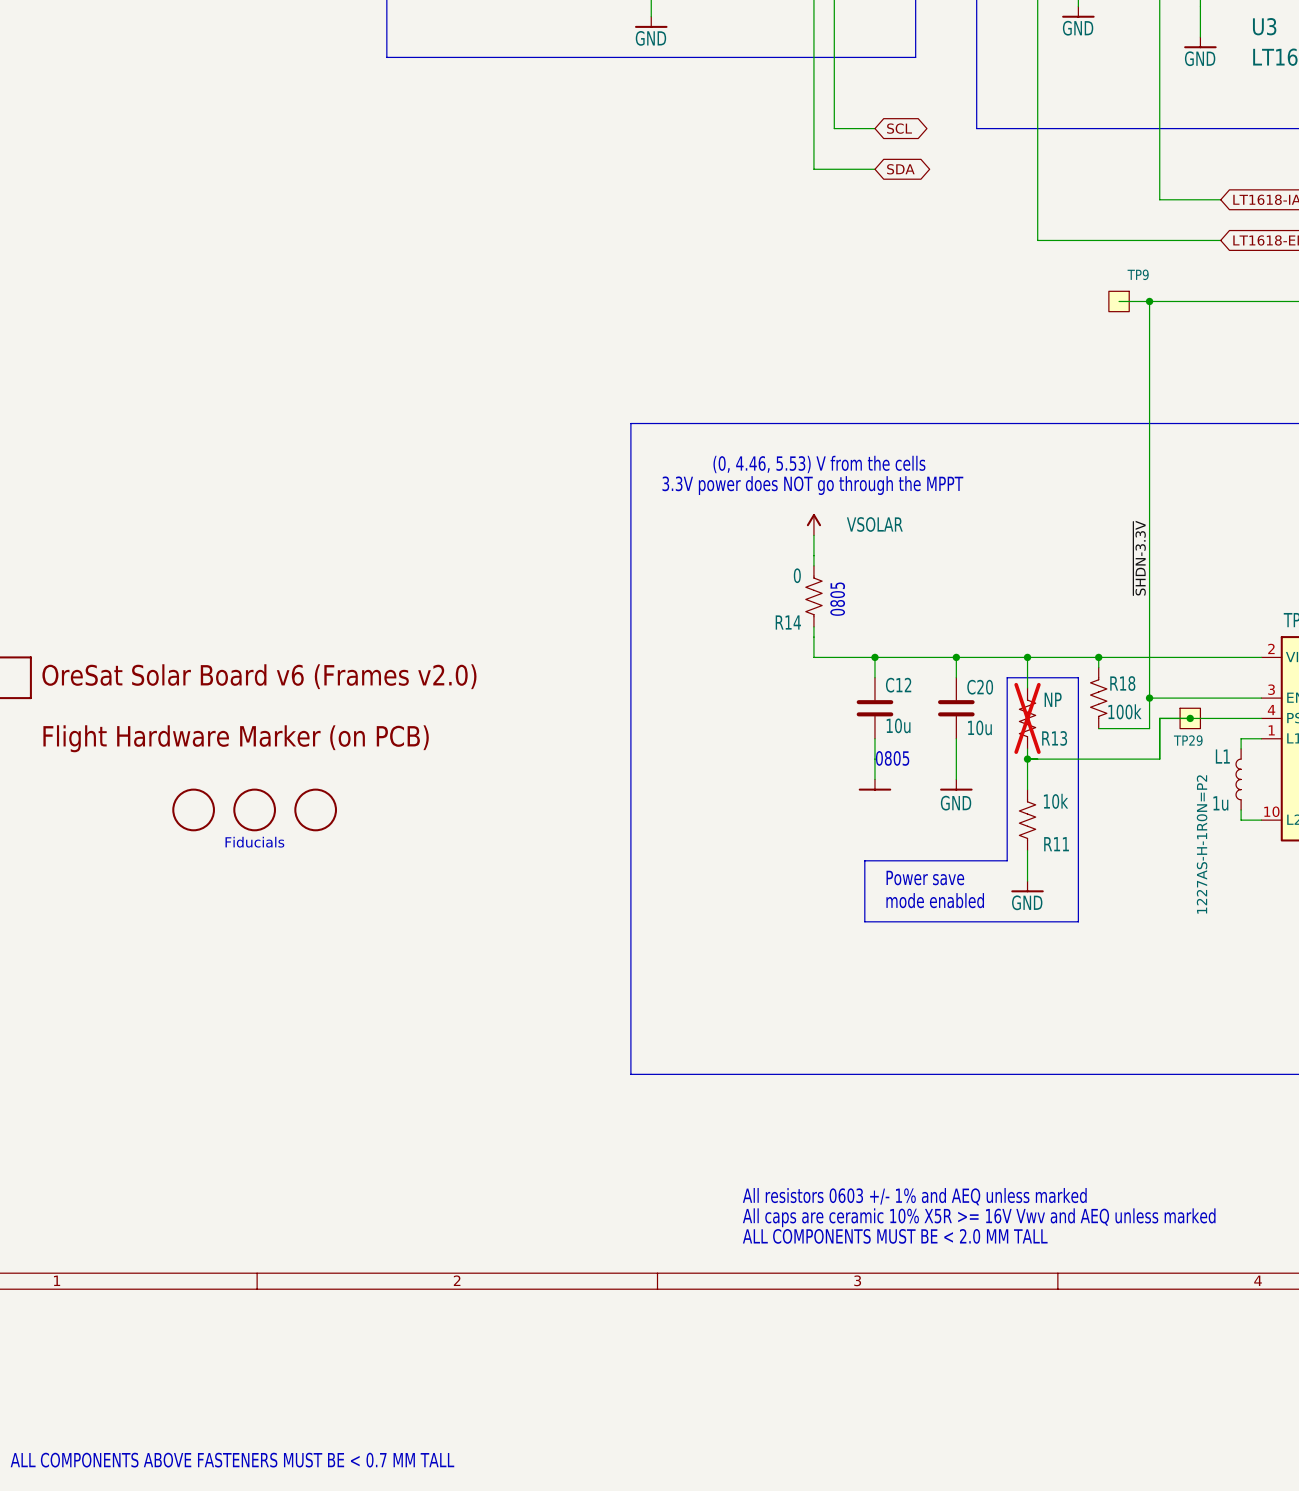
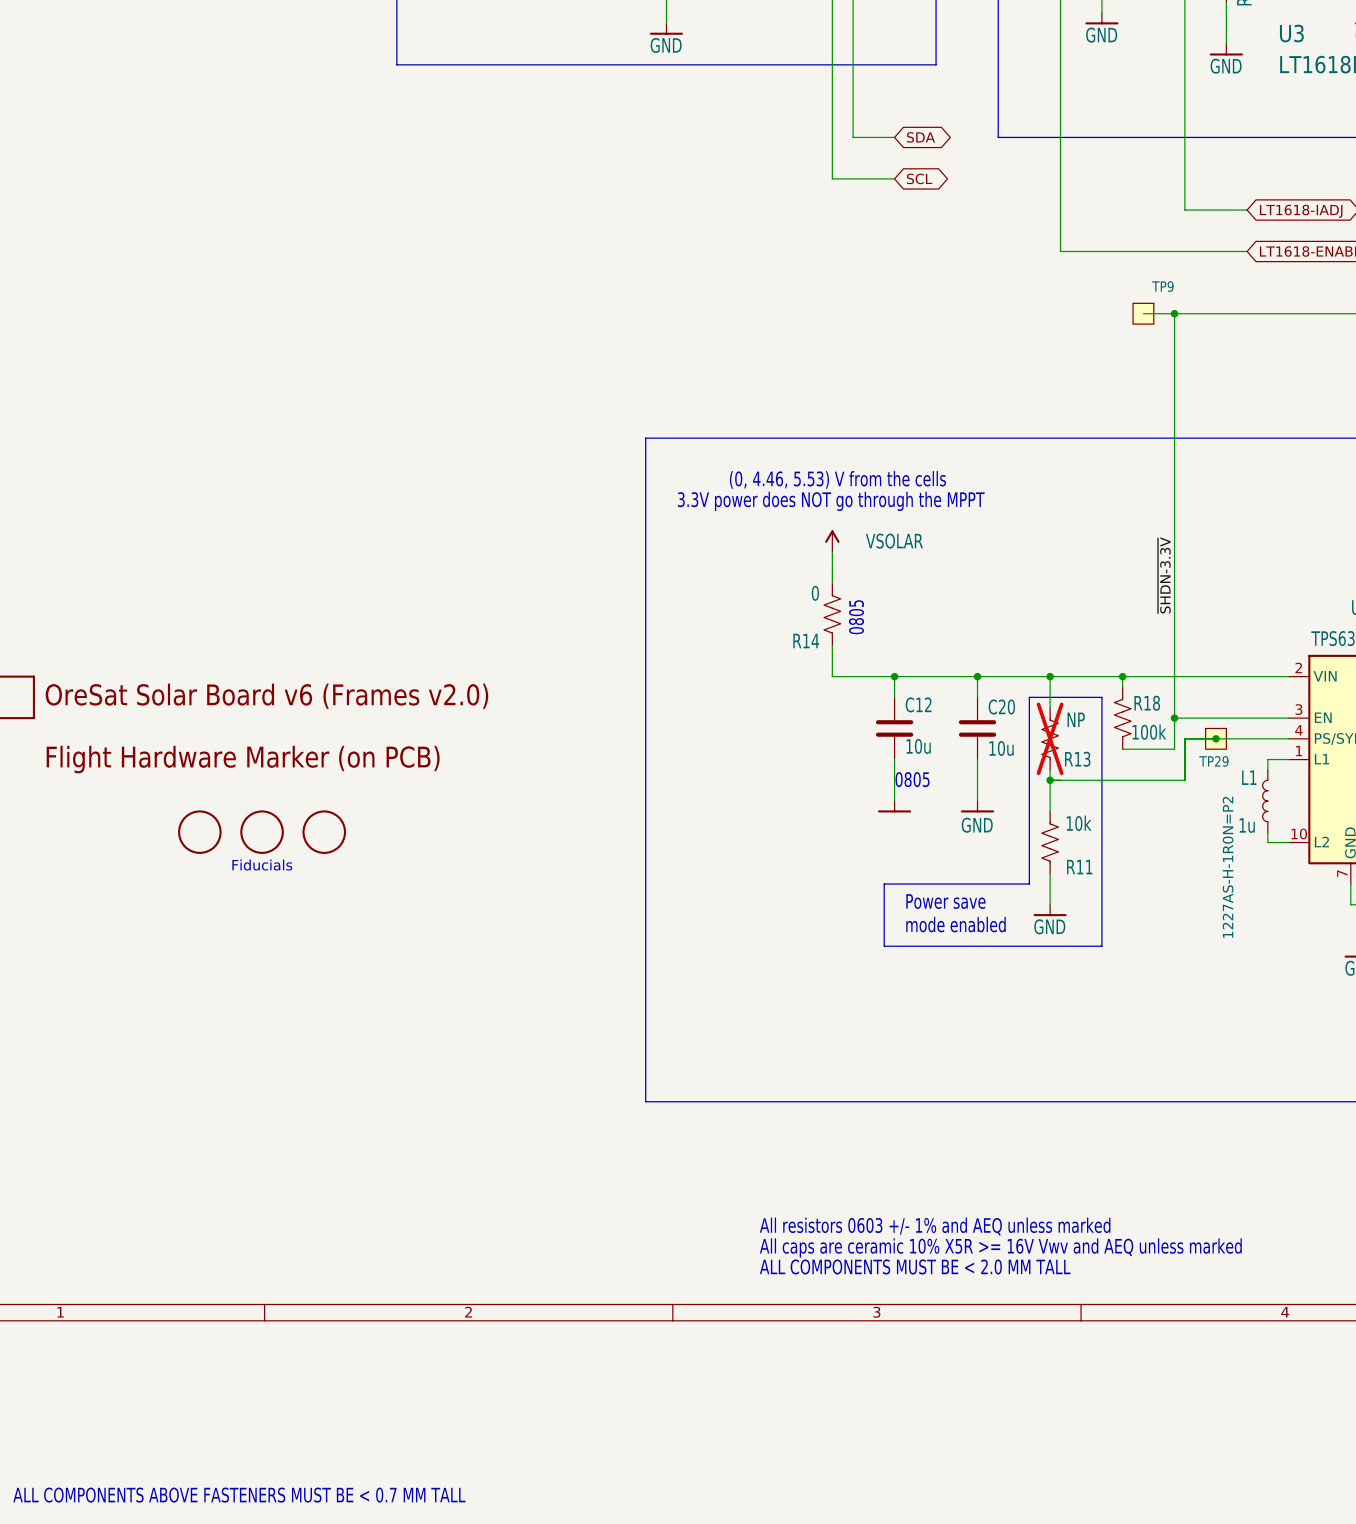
global label: SCL (899, 128) -> SDA (920, 137)
global label: SDA (900, 169) -> SCL (919, 178)

